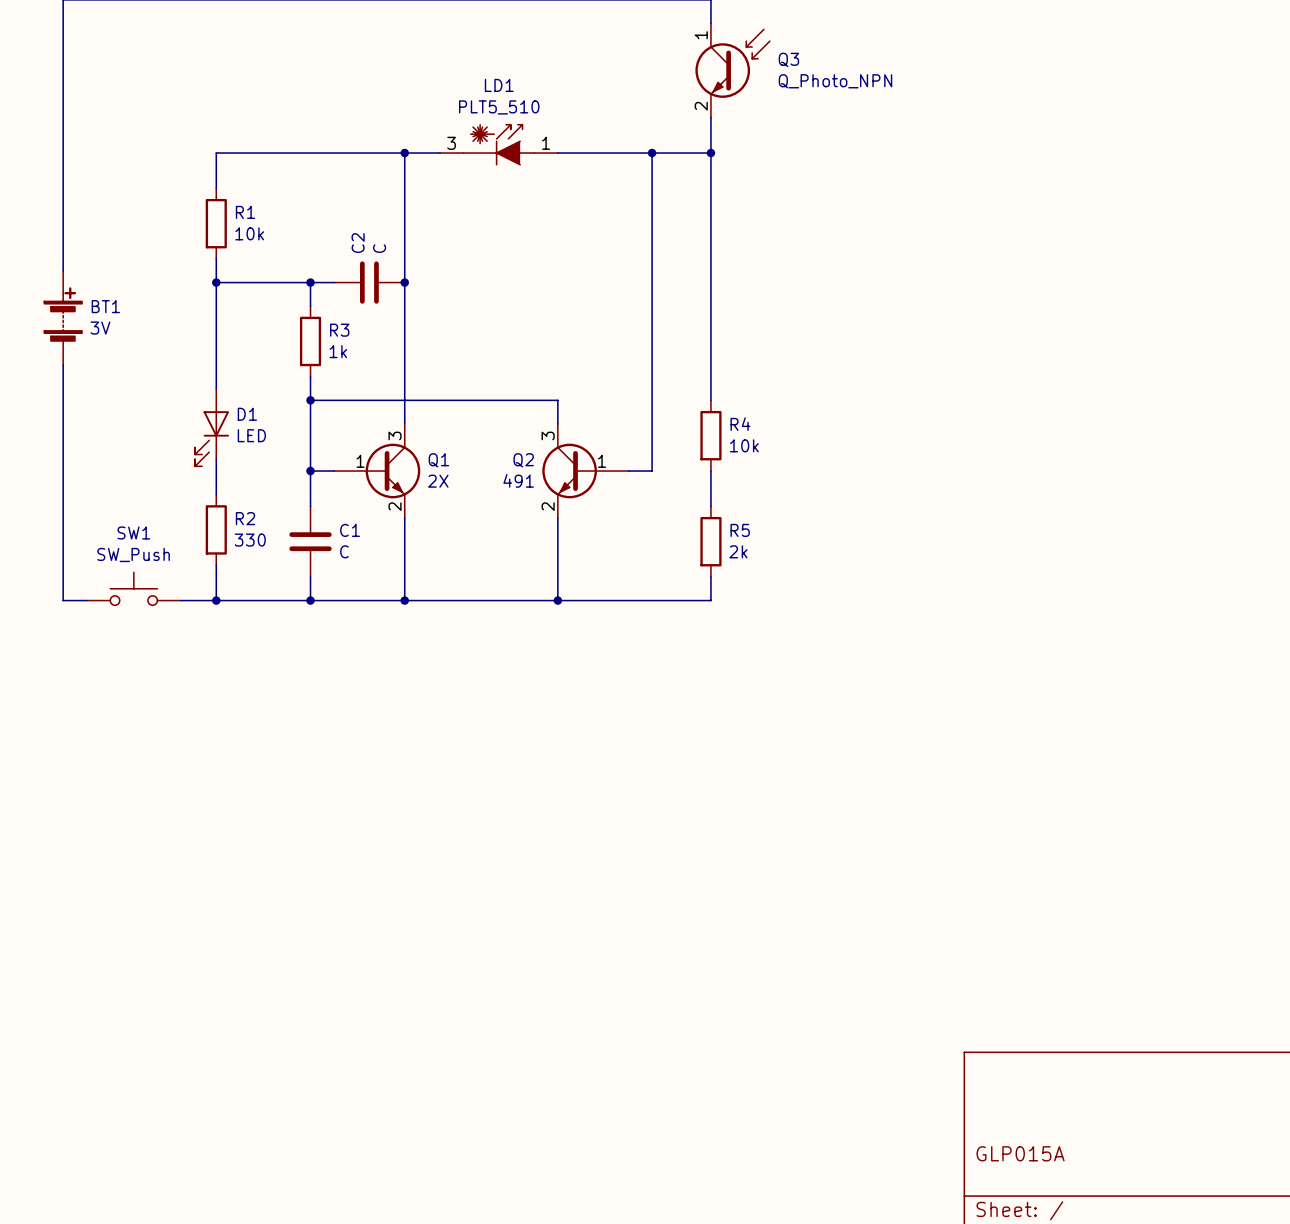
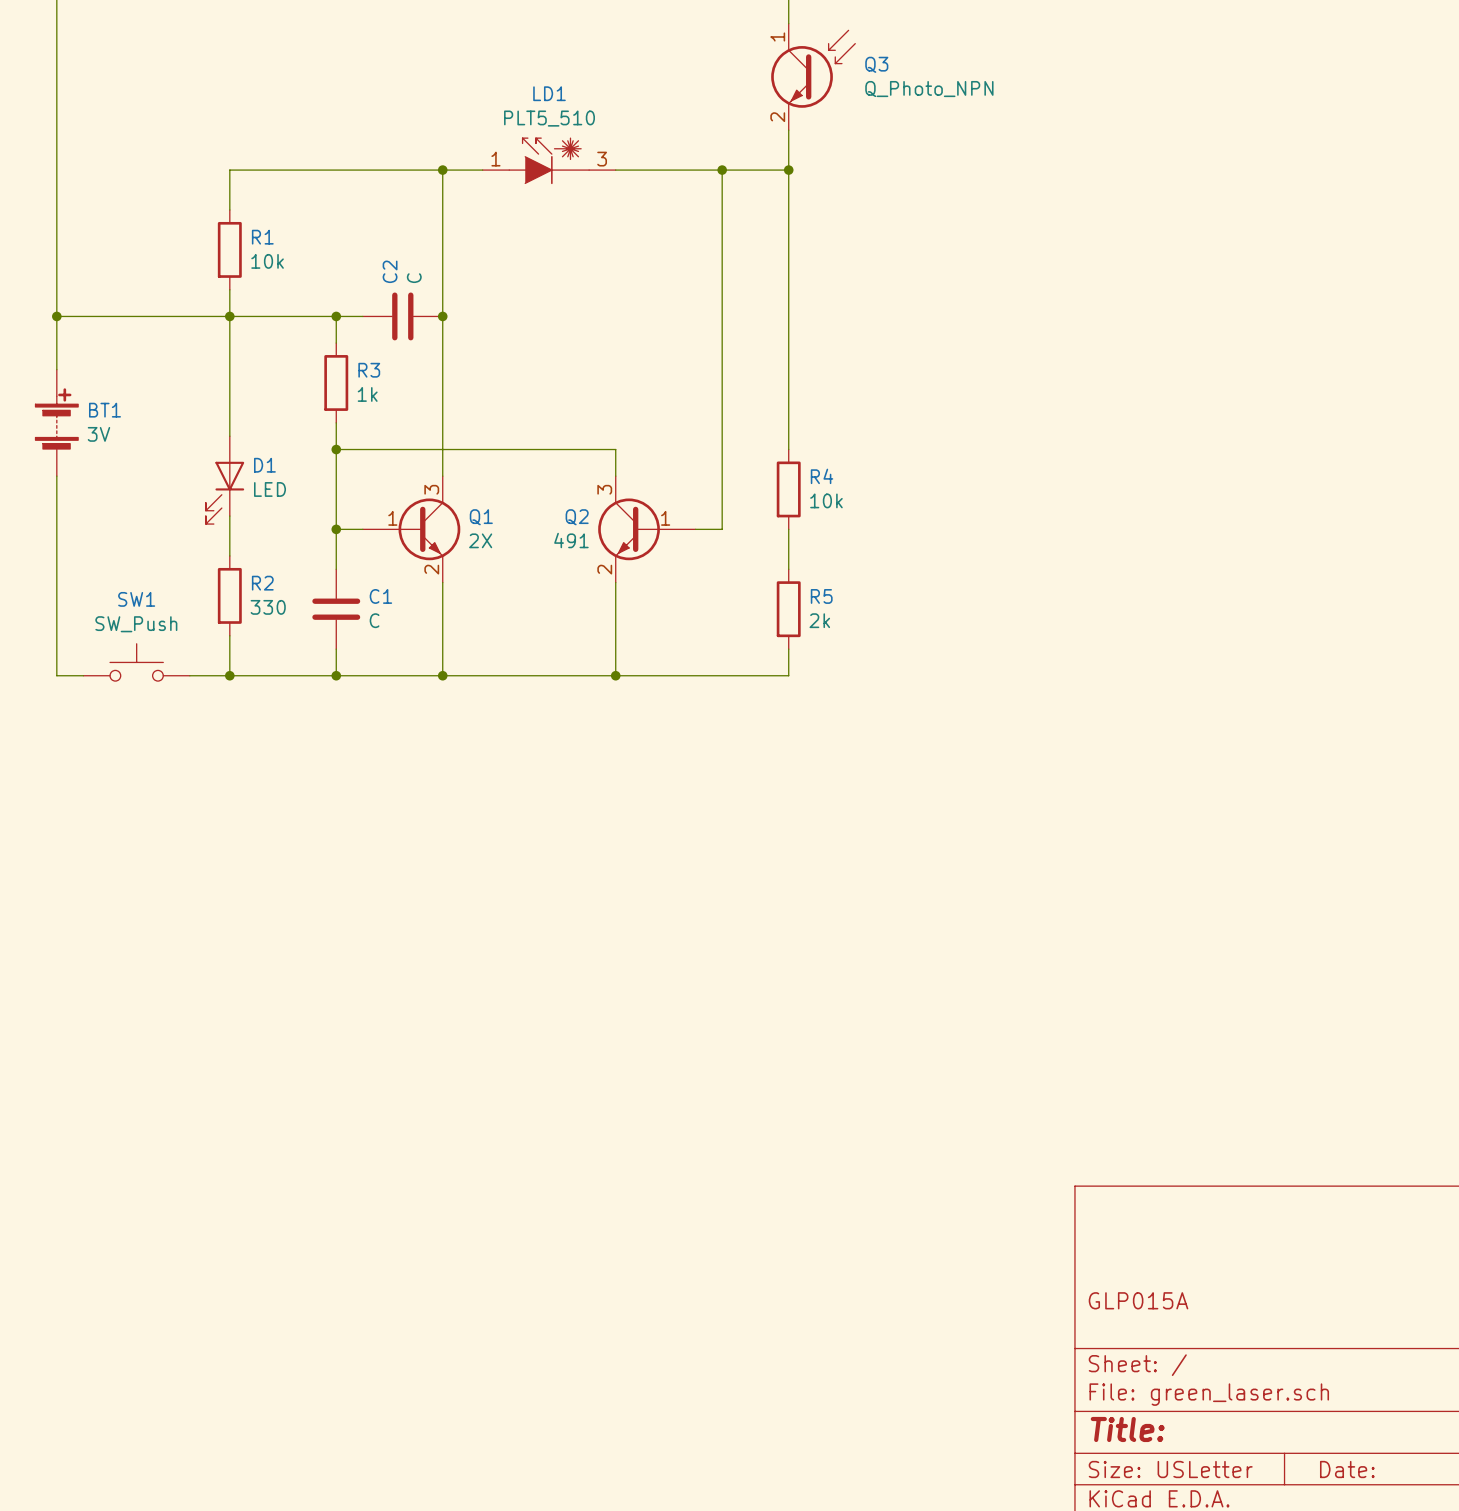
LD1 flip: as is (498, 145) -> left-right (549, 161)
wire: none -> (56, 316) (229, 316)
junction: none -> (56, 316)
BT1 position: (63, 317) -> (56, 422)

